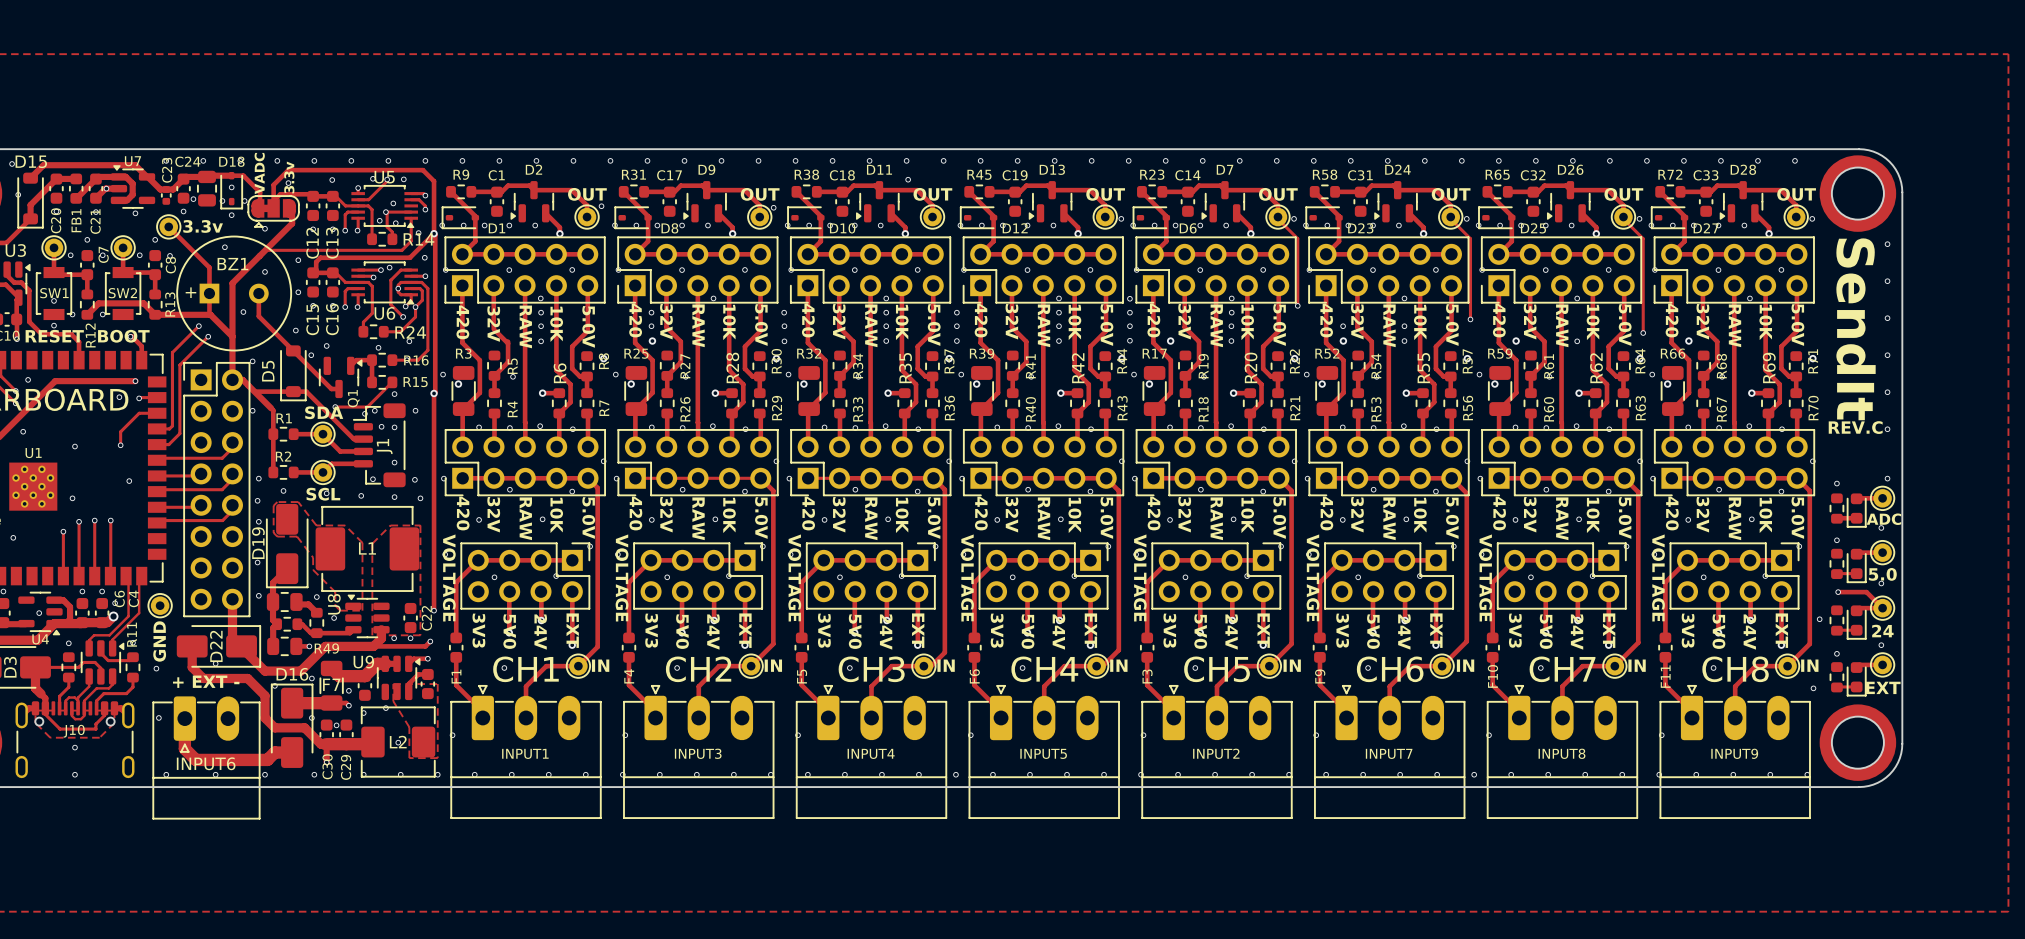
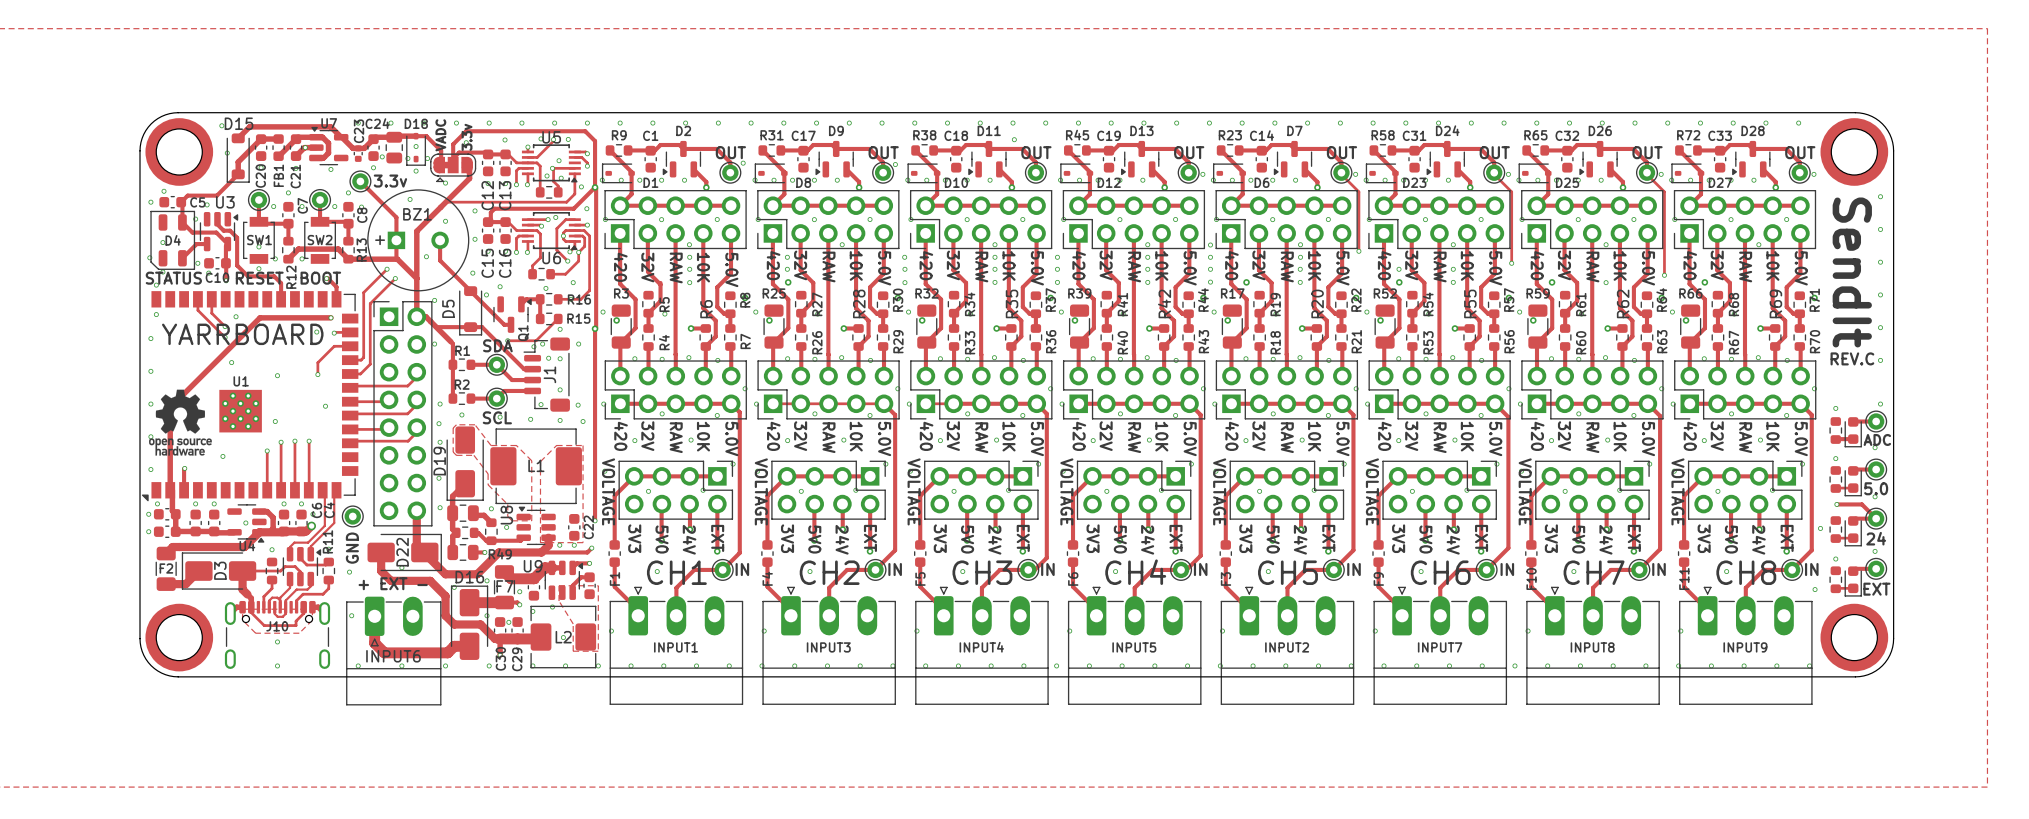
R14 name: R14 (418, 239) -> none
R24 name: R24 (410, 332) -> none

